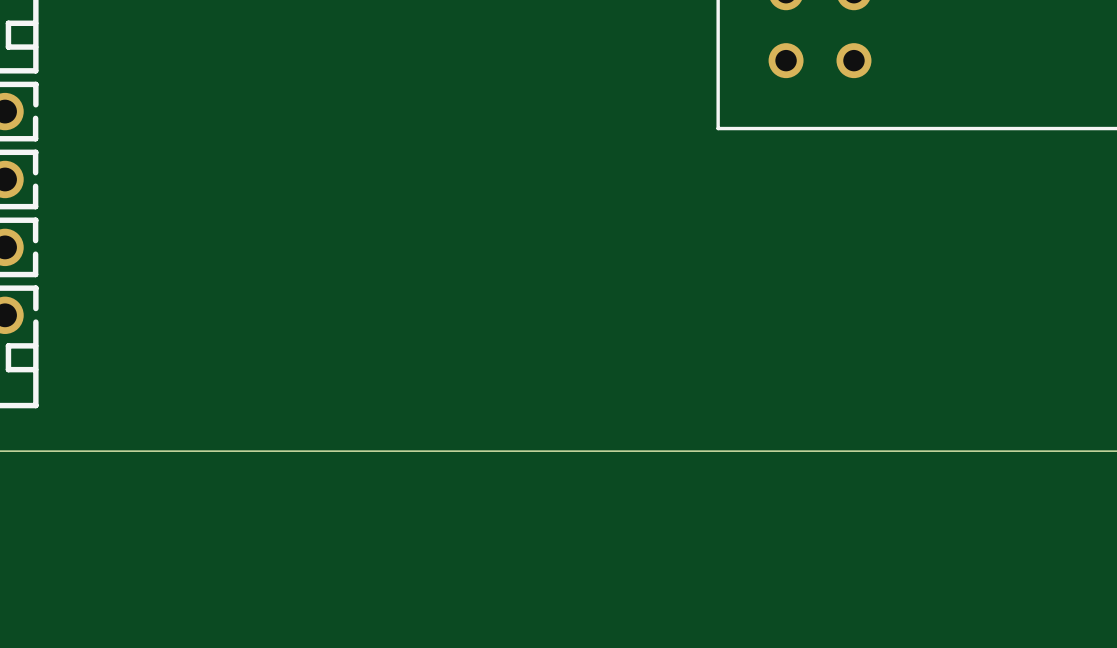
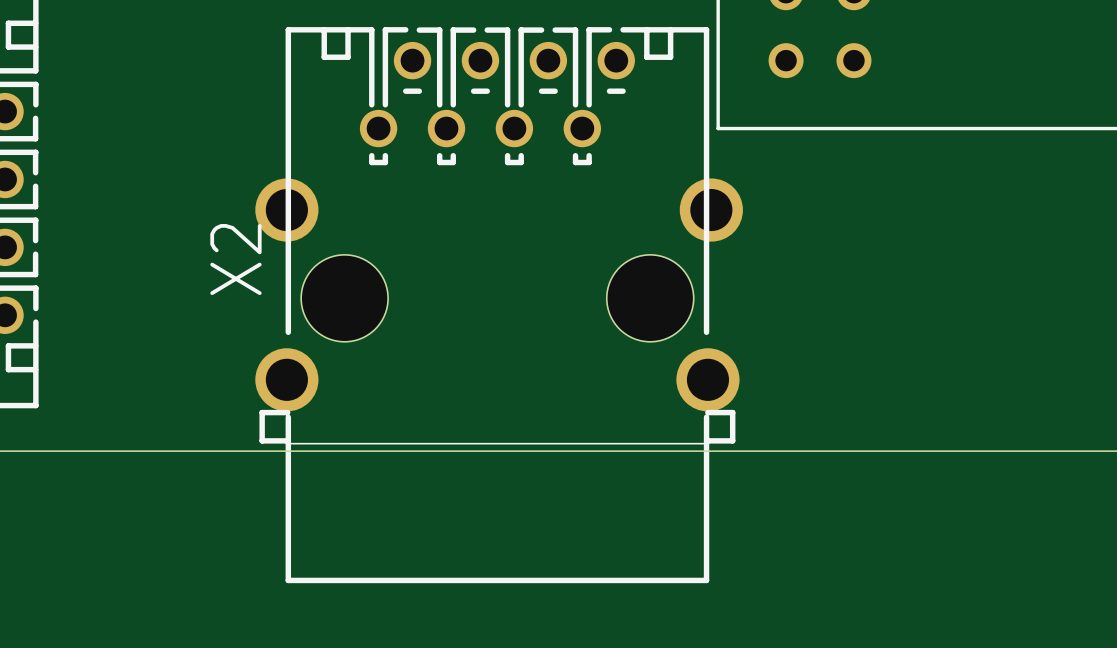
X2: none -> (499, 305)

